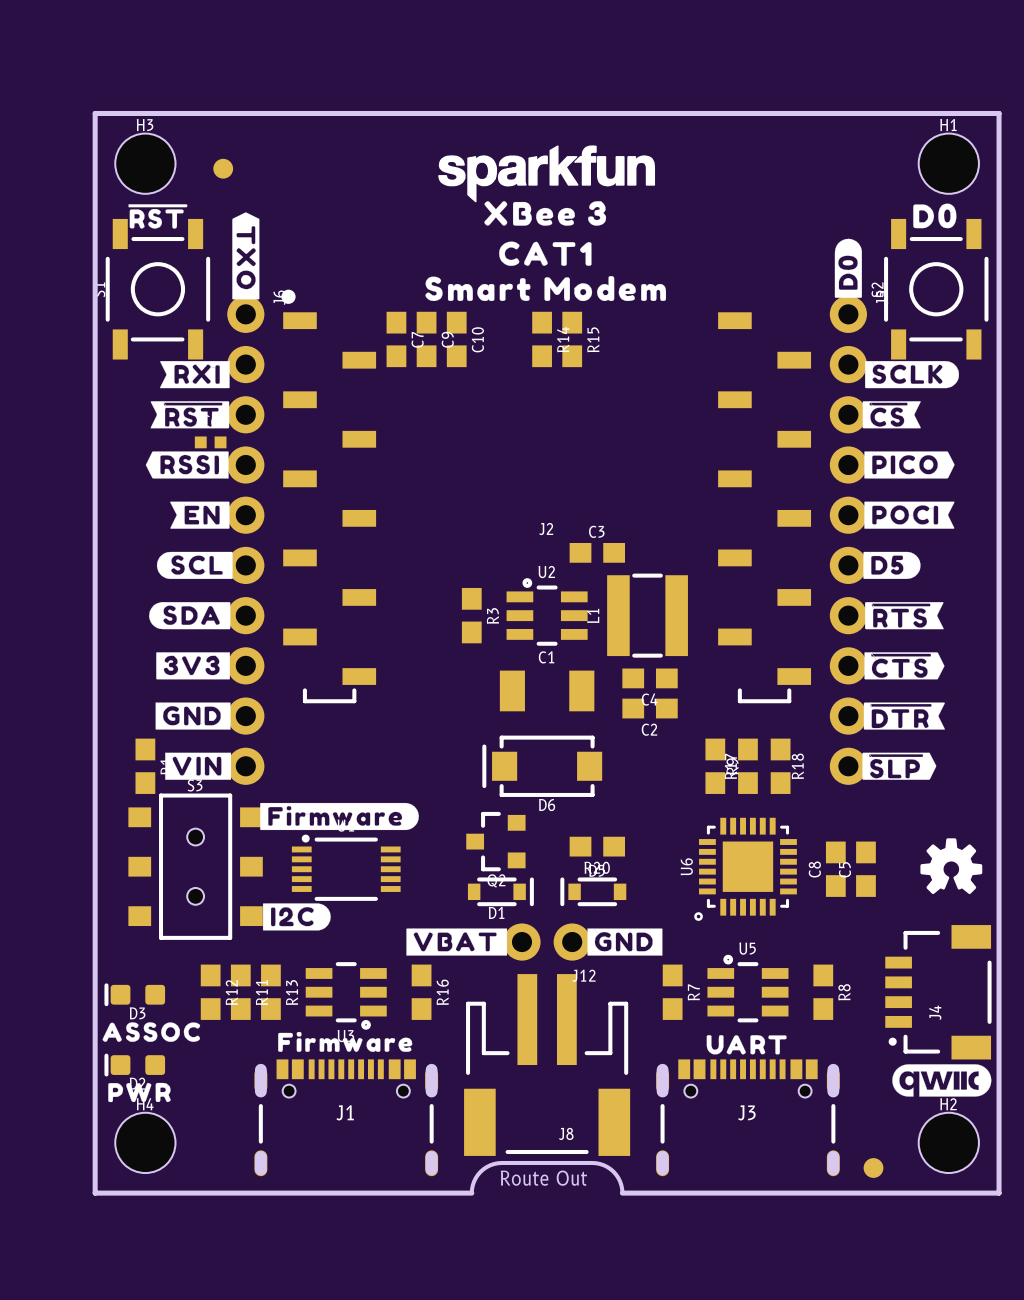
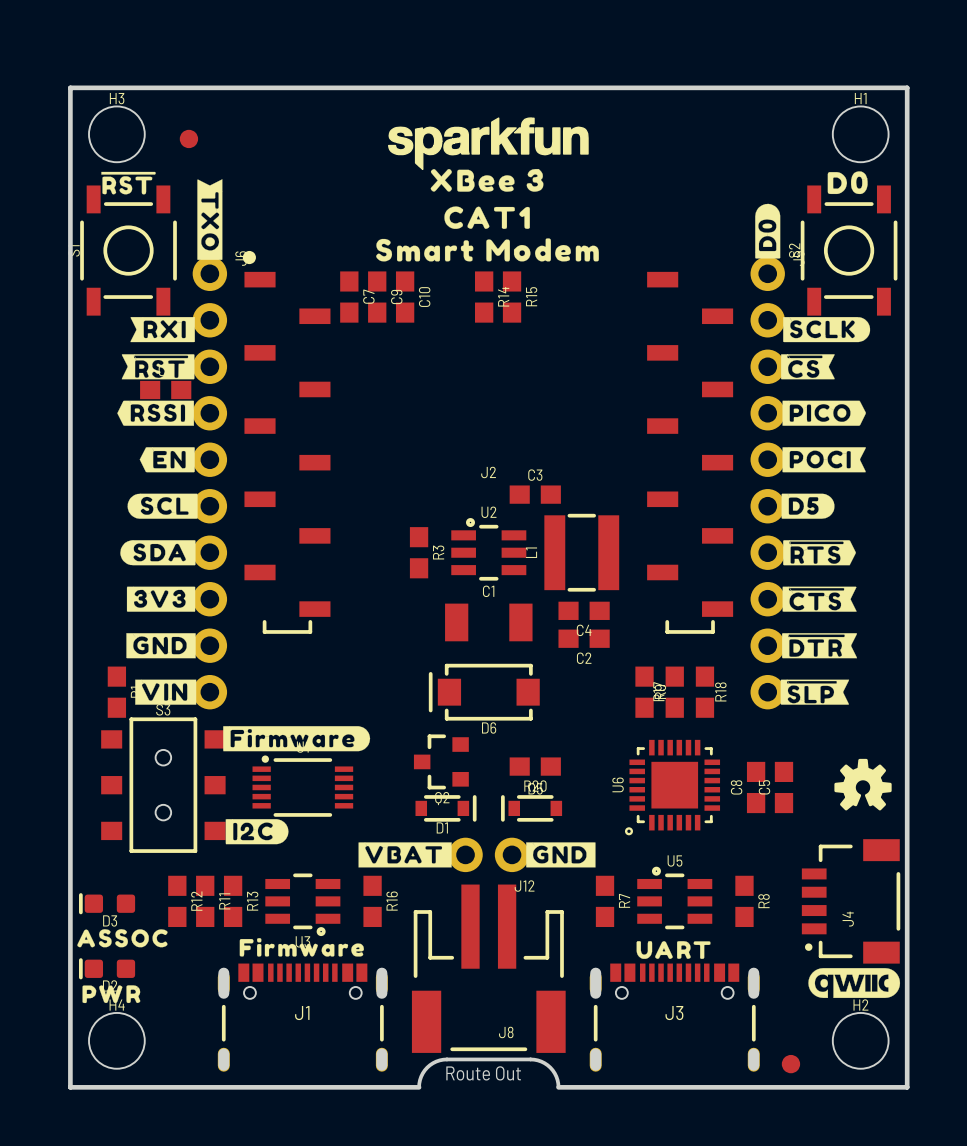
drawing shape: [232, 212, 260, 300] -> [197, 179, 223, 260]
part footprint: [194, 436, 227, 449] -> [140, 380, 192, 400]
drawing shape: [170, 501, 230, 529] -> [139, 447, 195, 473]
drawing shape: [865, 602, 944, 630] -> [783, 540, 856, 566]
drawing shape: [864, 652, 945, 680] -> [782, 586, 857, 612]
drawing shape: [862, 752, 937, 780] -> [780, 679, 850, 705]

